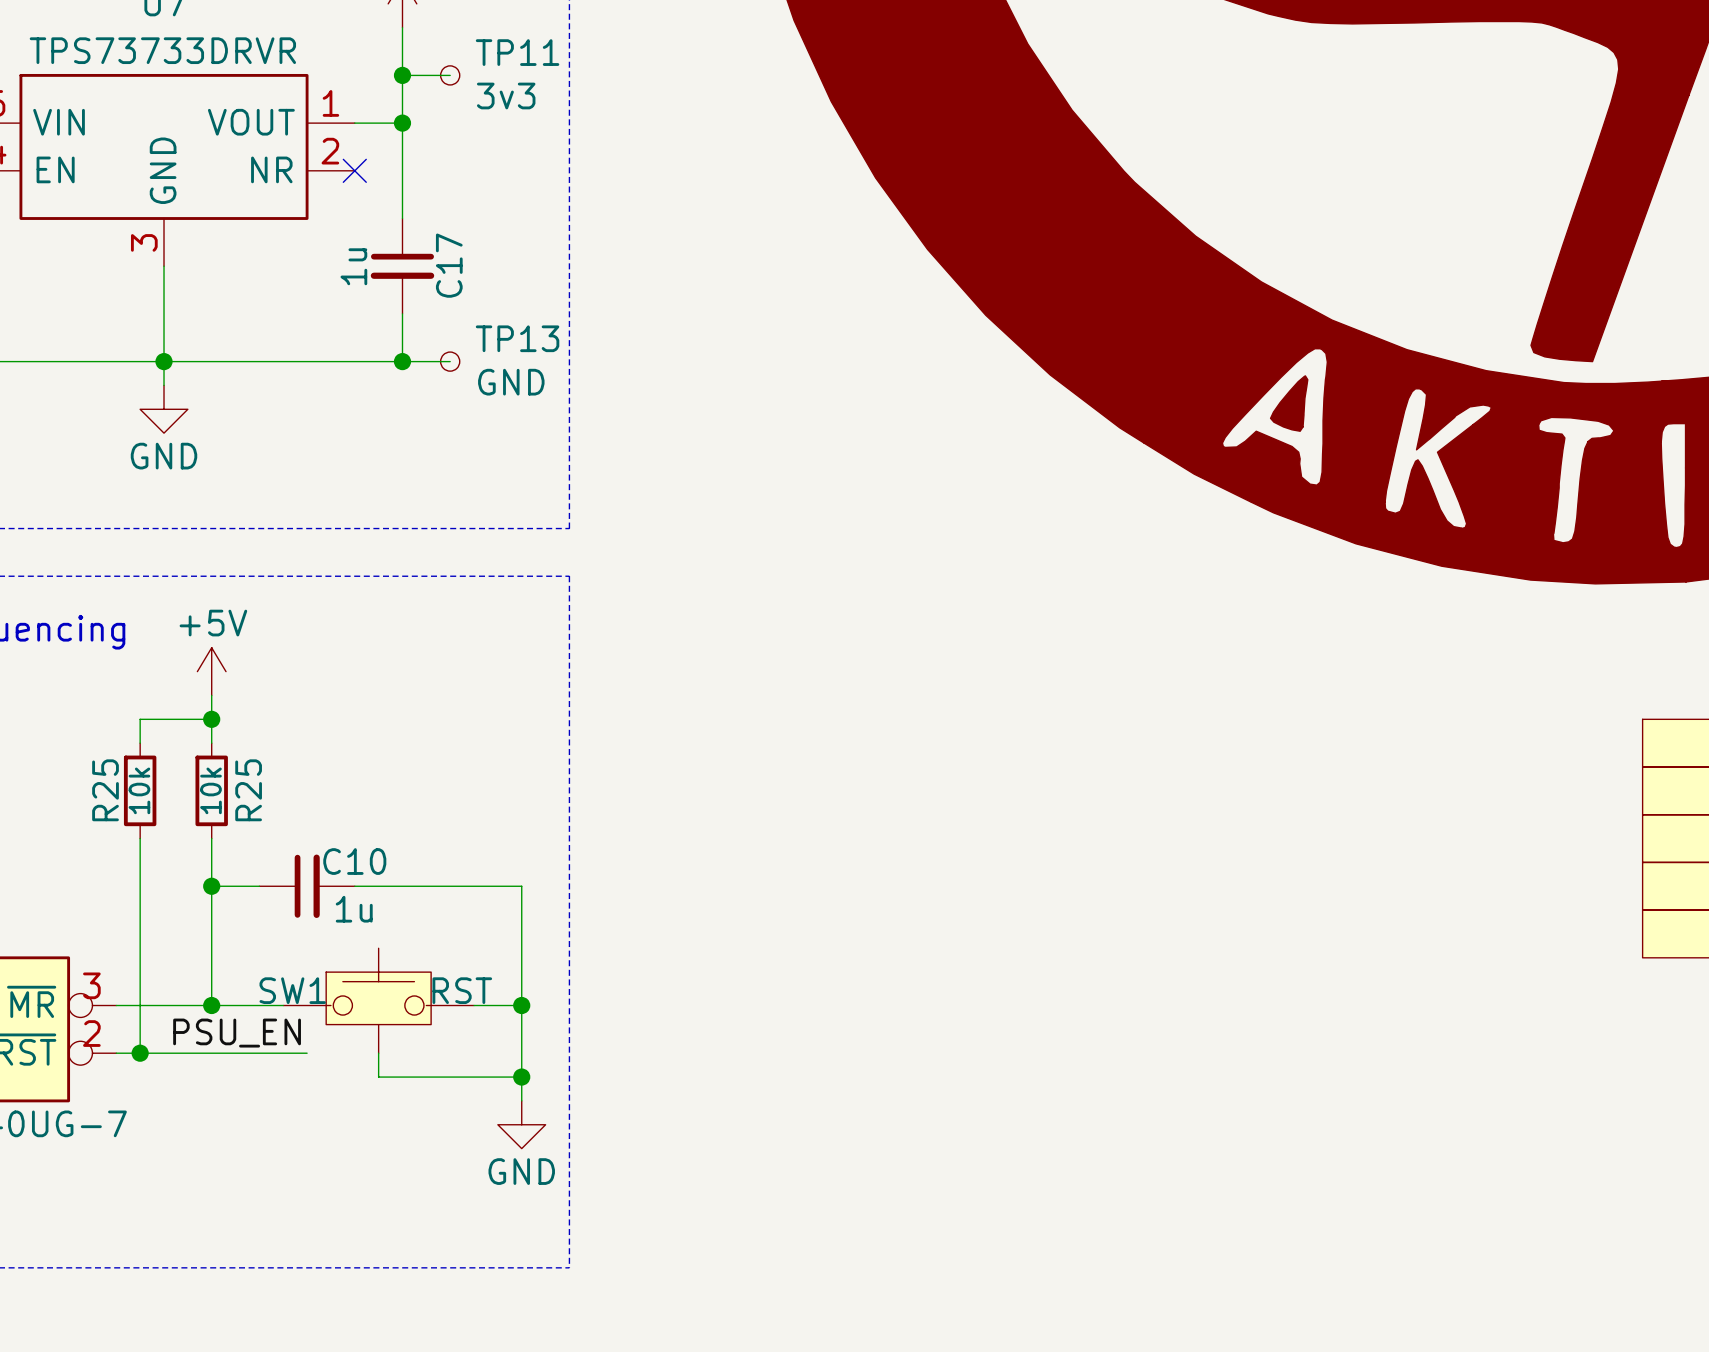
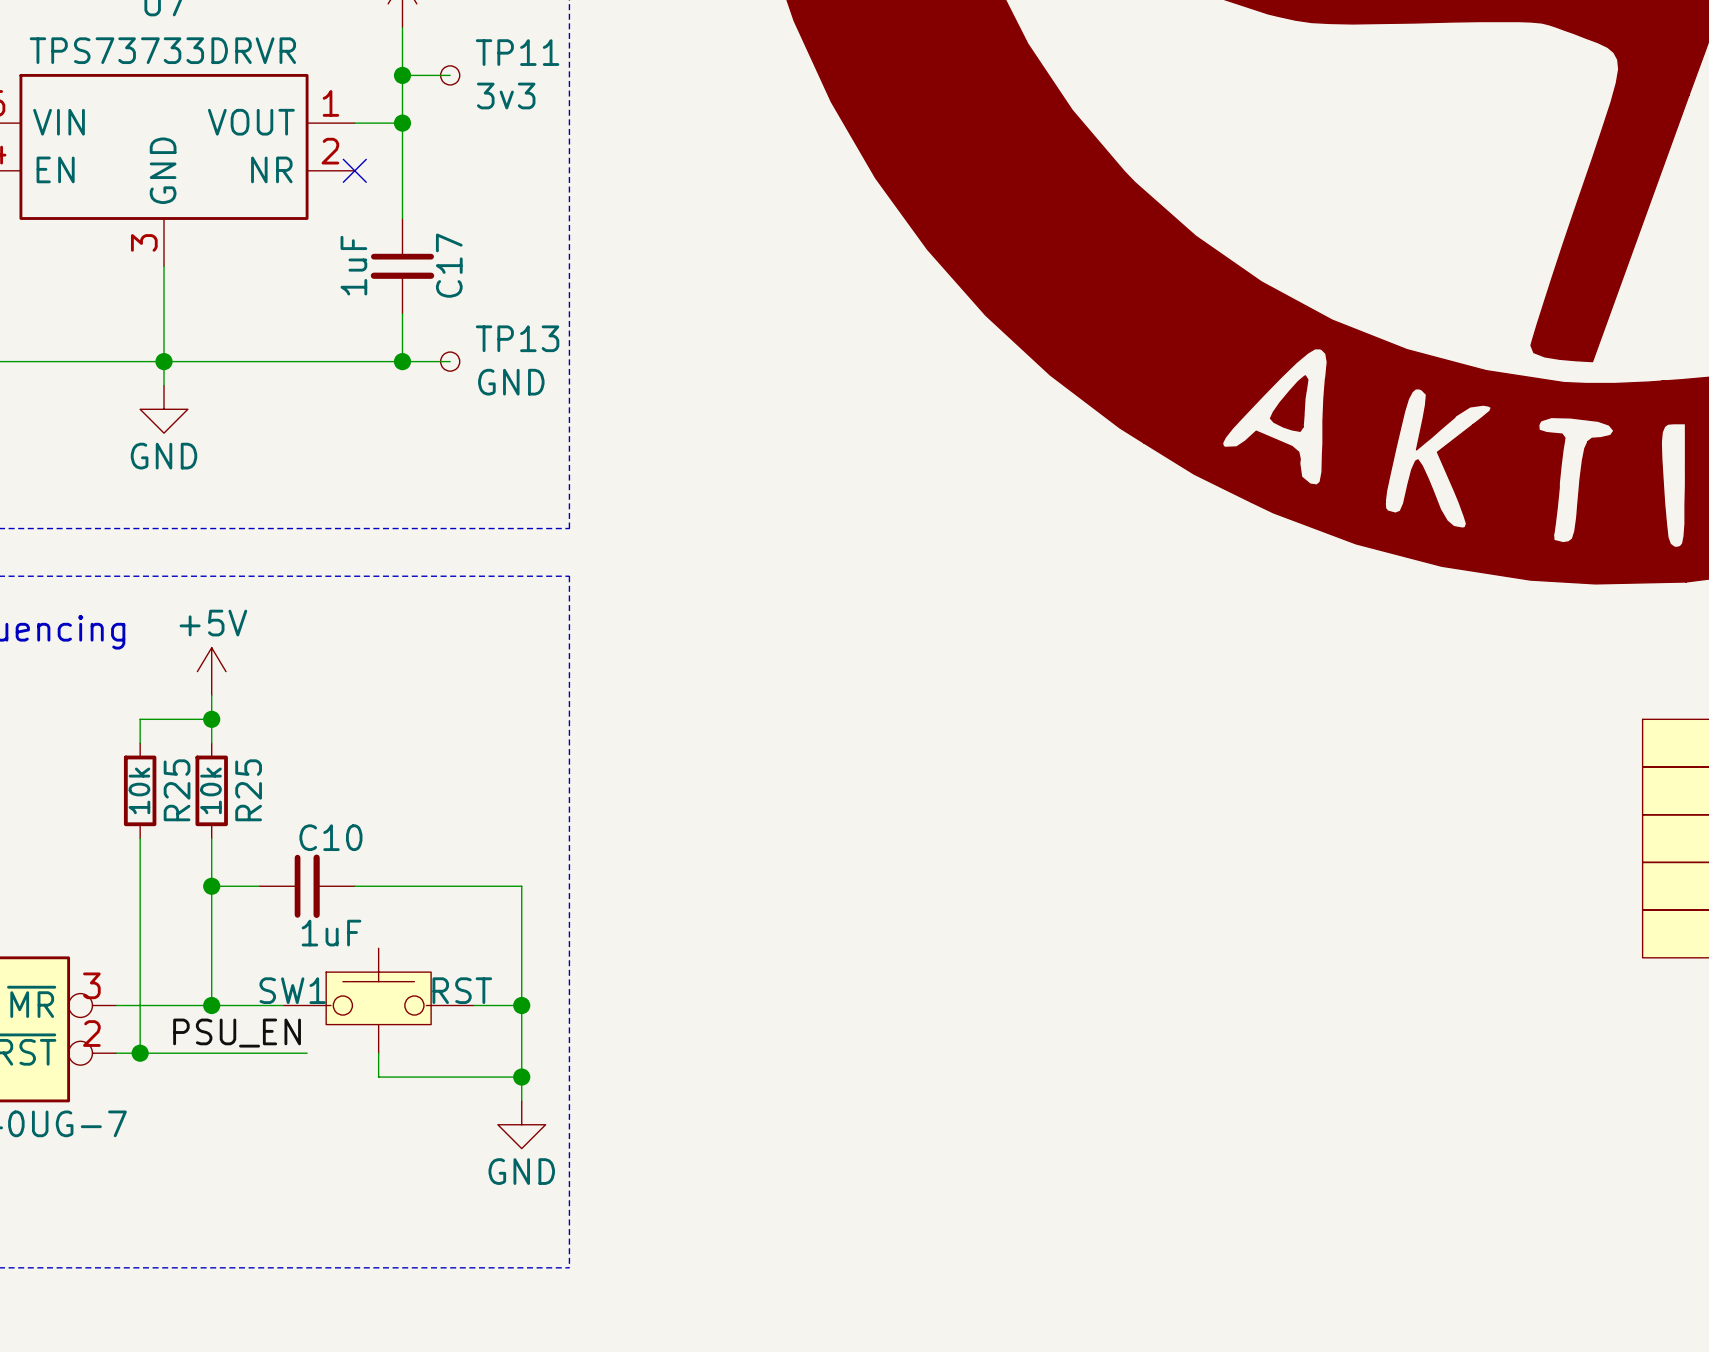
C17 value: 1u (353, 266) -> 1uF (353, 265)
R25 name position: R25 (105, 790) -> R25 (177, 790)
C10 name position: C10 (354, 861) -> C10 (330, 837)
C10 value: 1u (354, 909) -> 1uF (331, 933)

